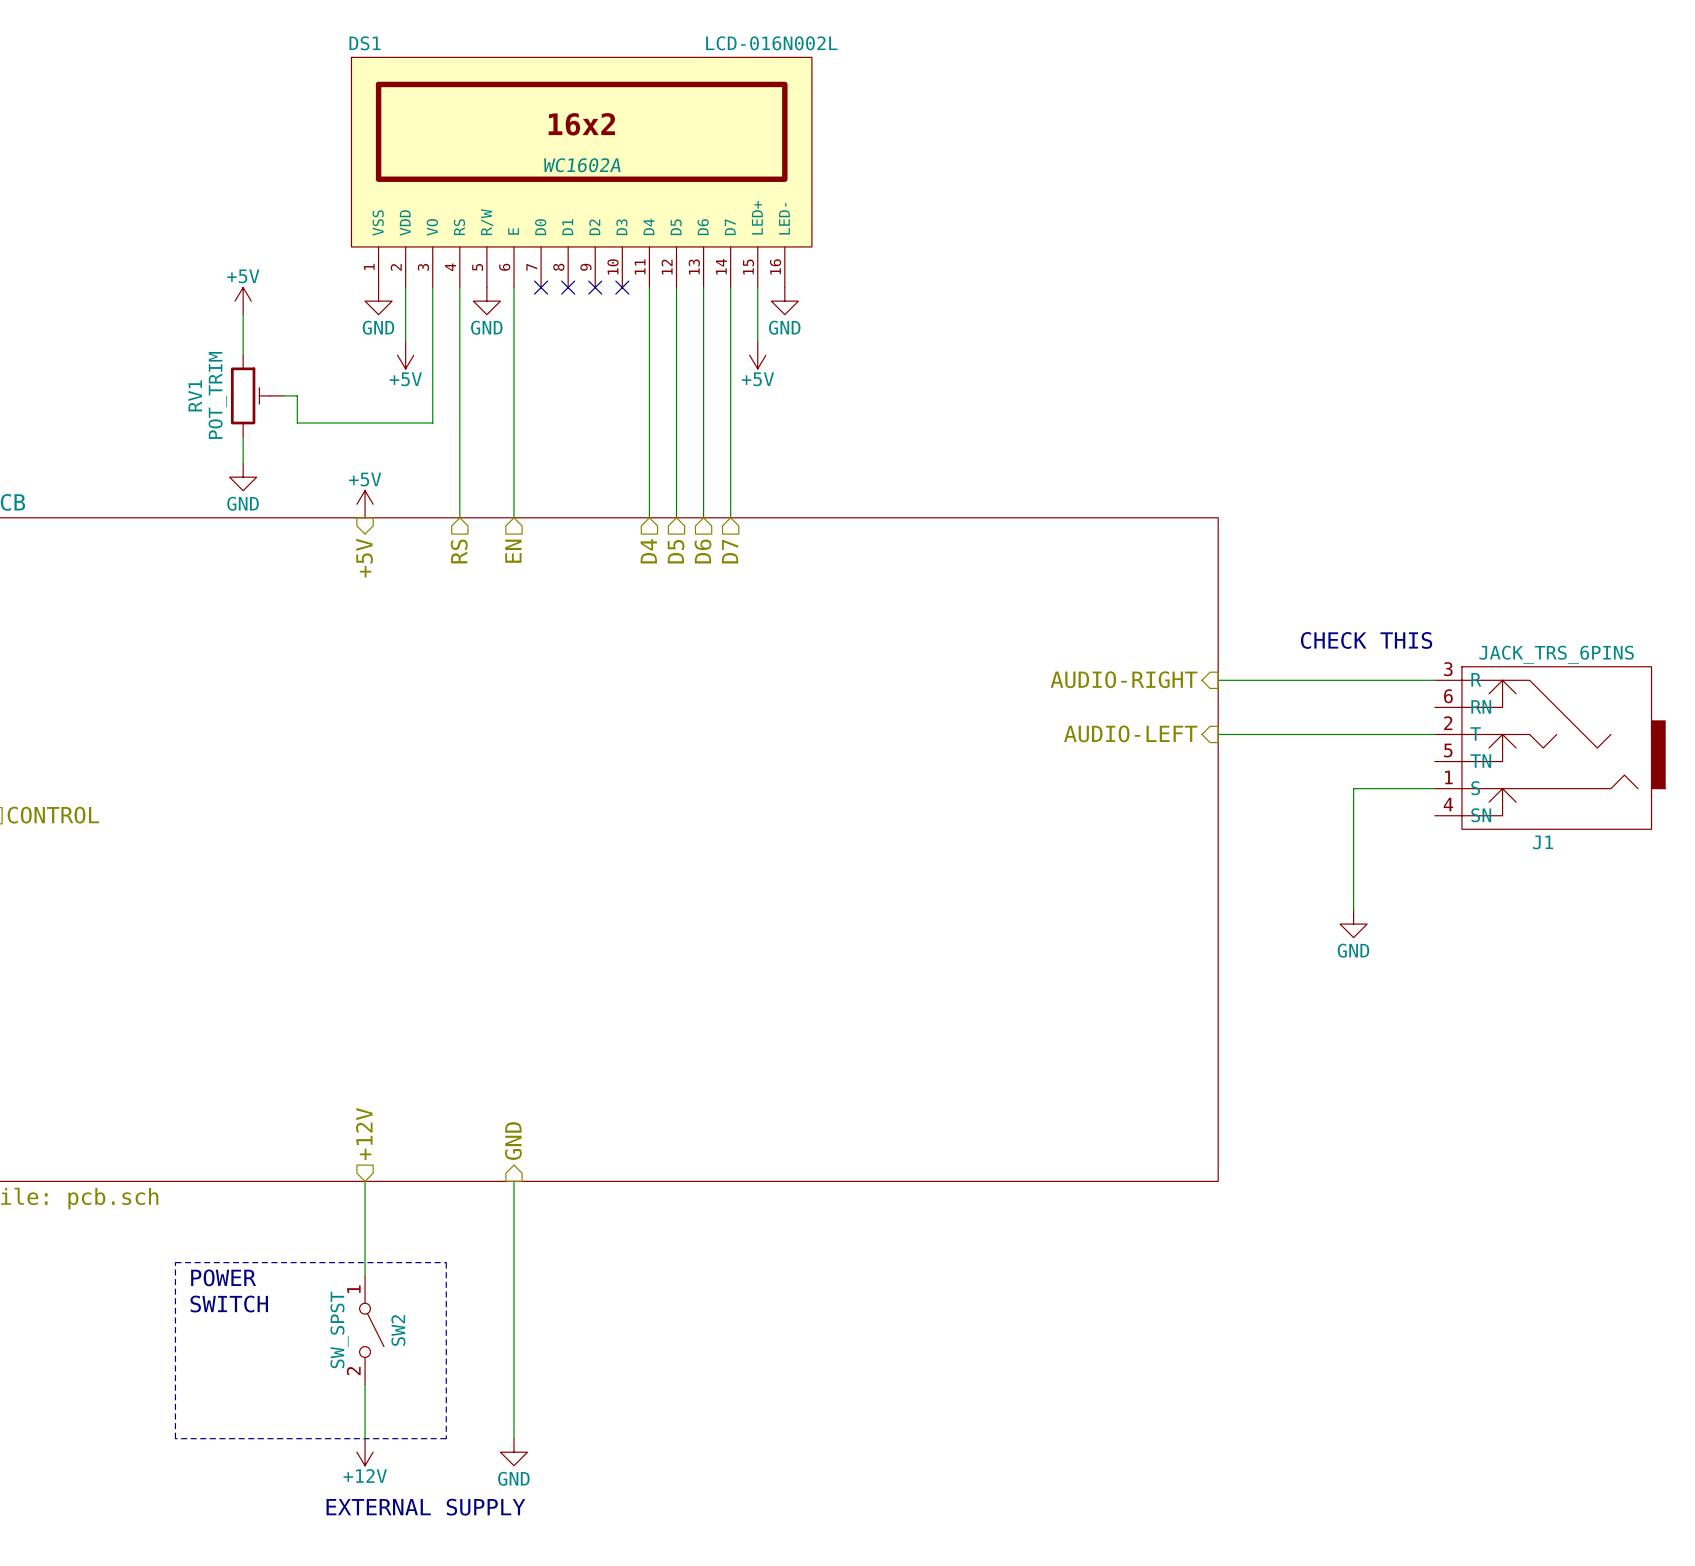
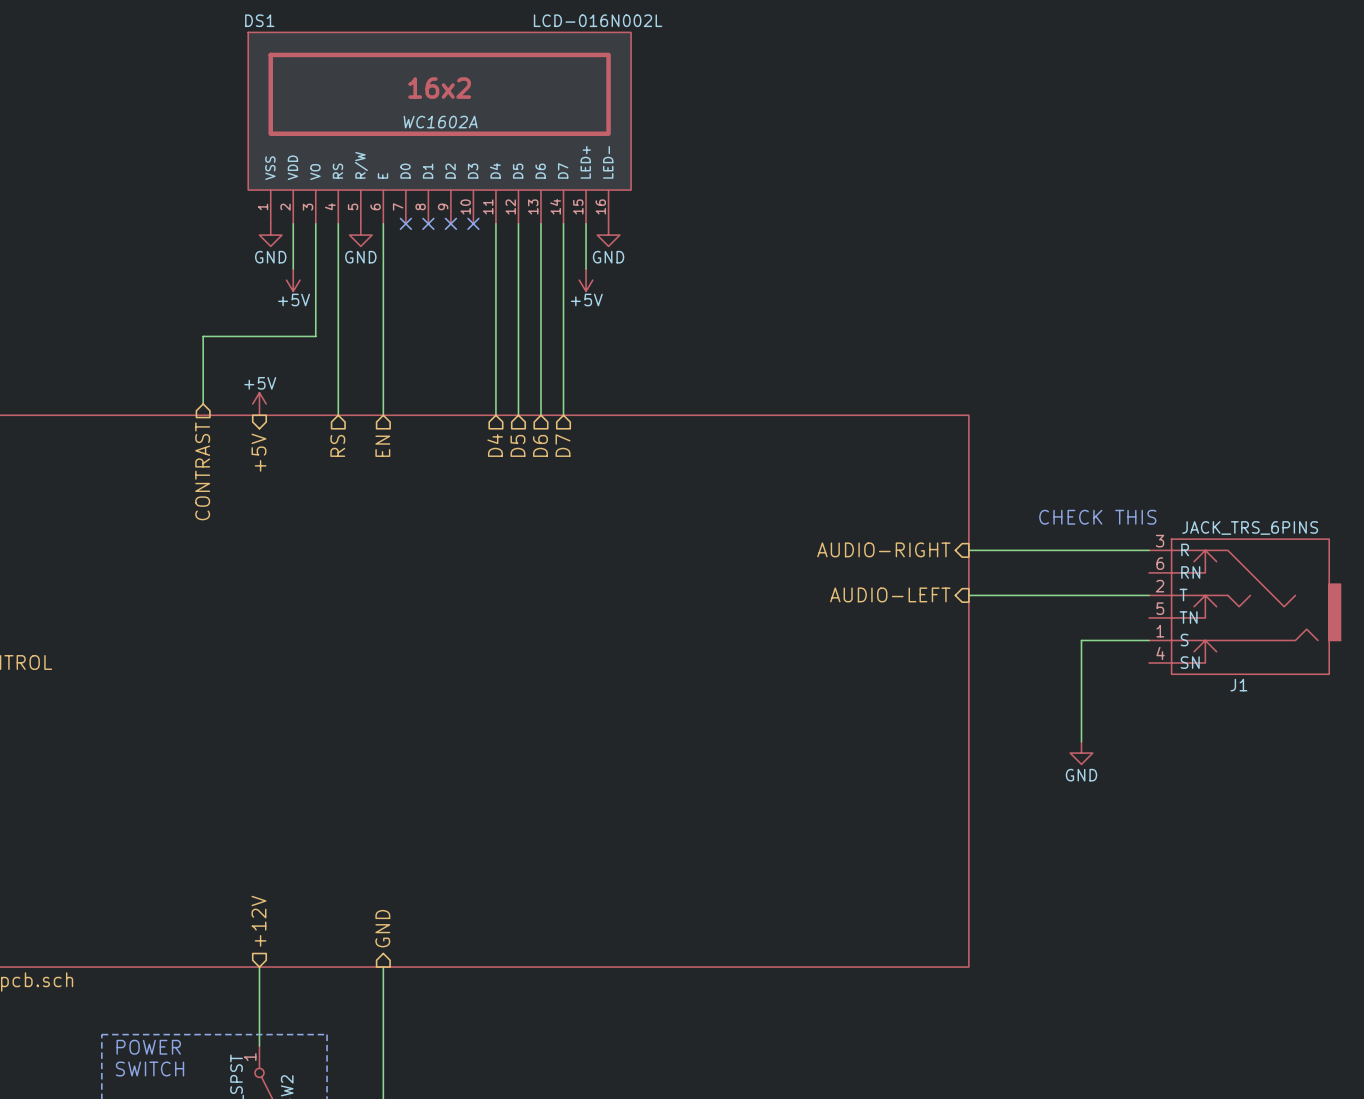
power symbol: +5V (243, 301) -> none
wire: (243, 314) (243, 355) -> none
RV1: POT_TRIM (257, 395) -> none
wire: (283, 395) (297, 395) (297, 423) -> (203, 404) (203, 336)
wire: (243, 436) (243, 463) -> none
power symbol: GND (243, 477) -> none
hierarchical label: none -> CONTRAST (202, 471)

